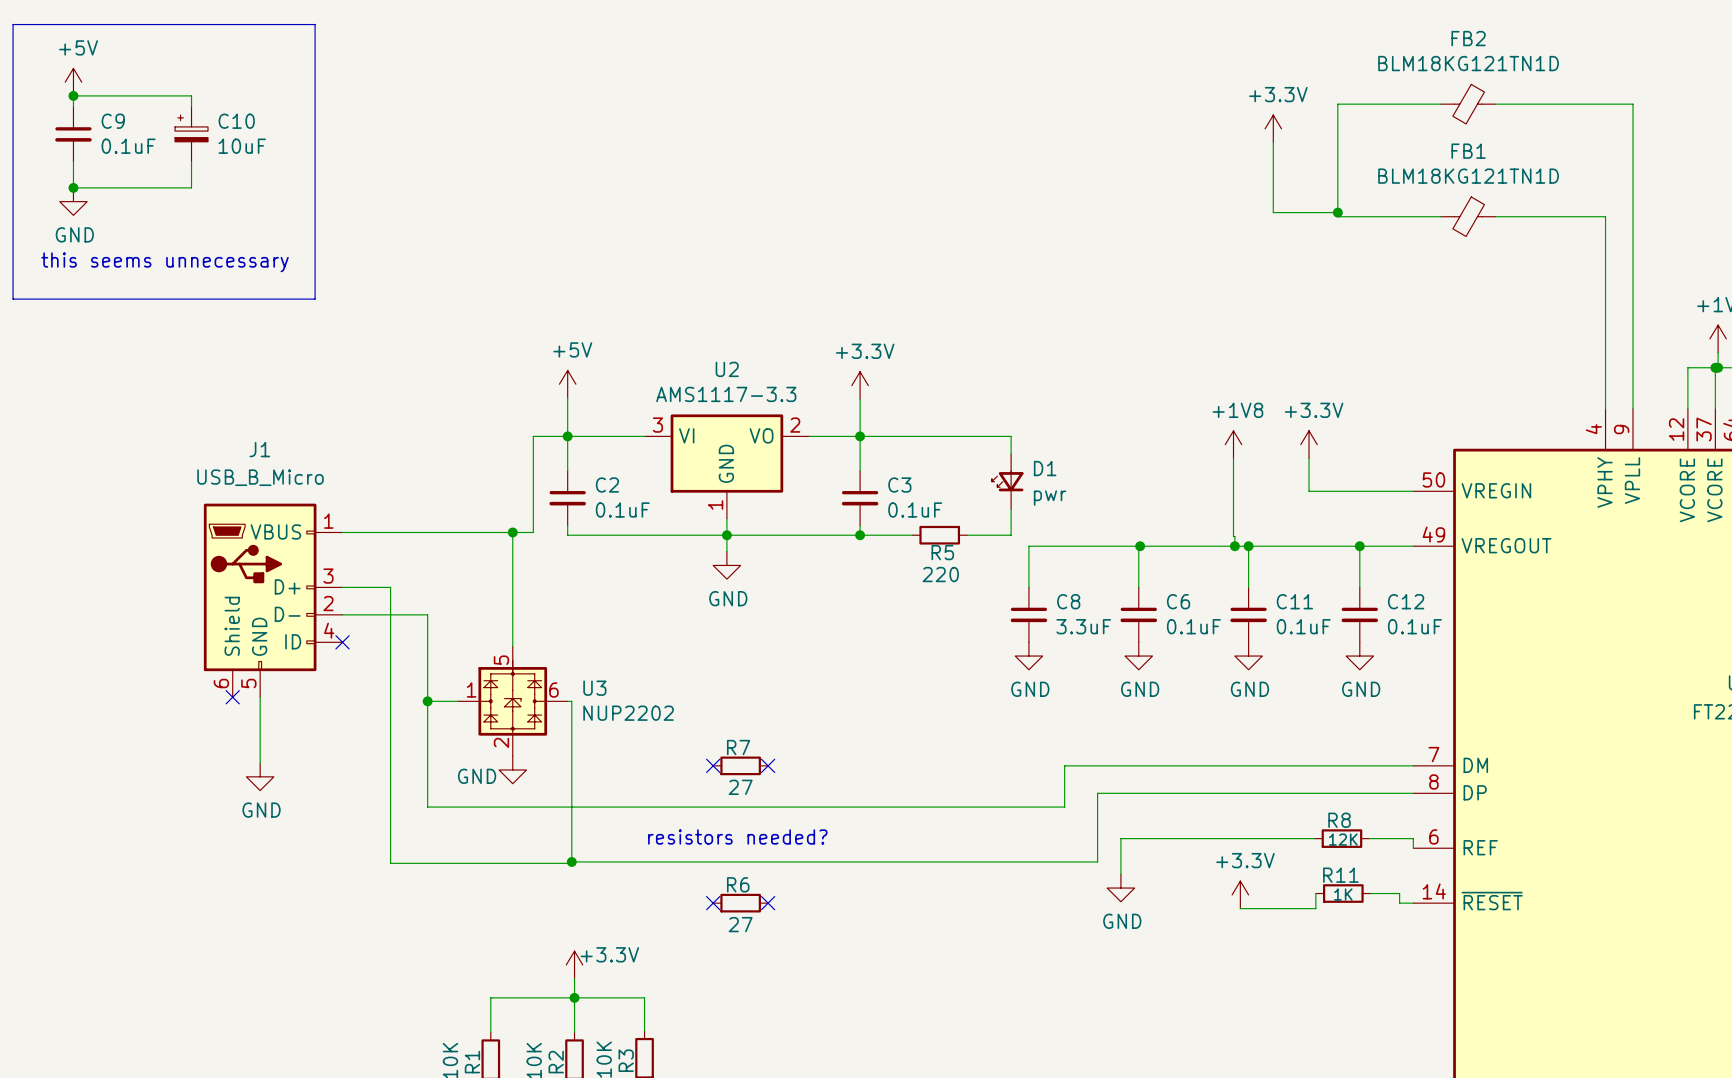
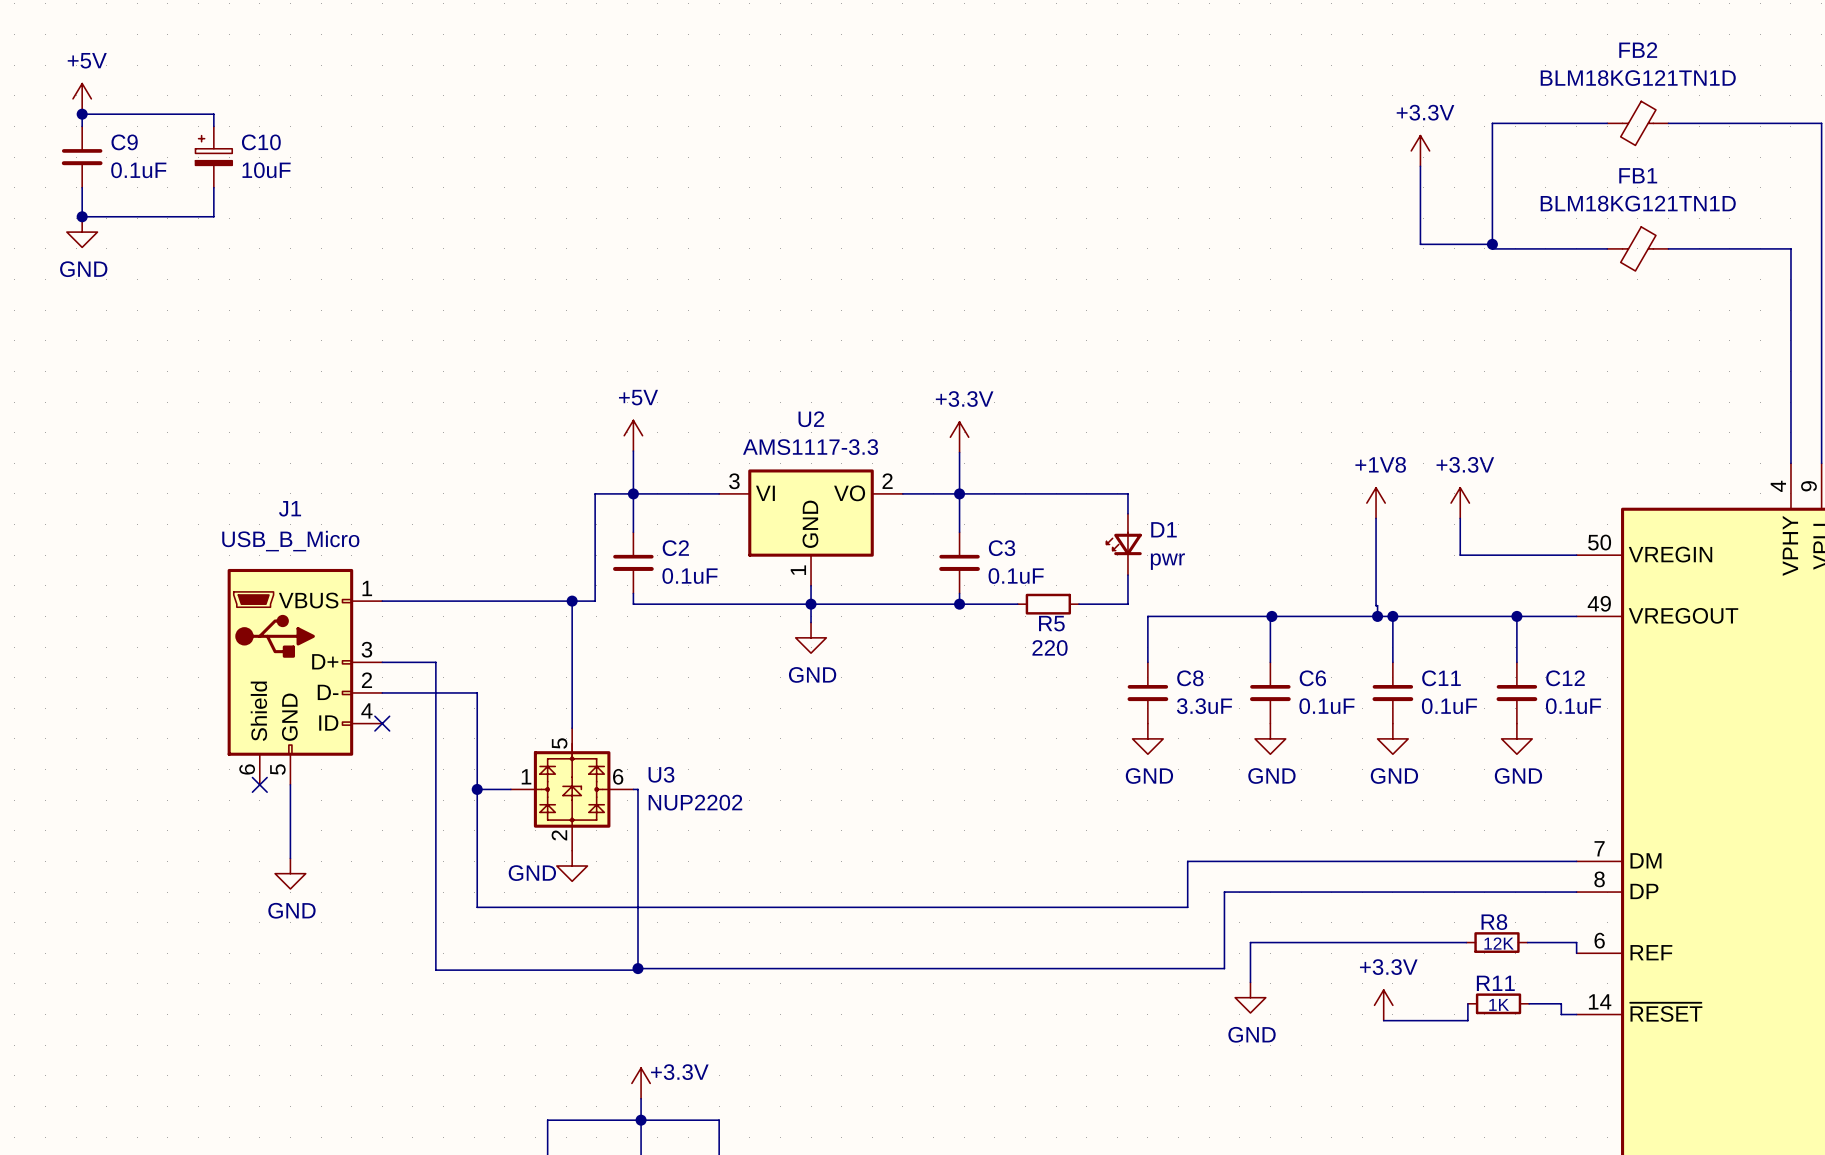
line: (13, 24) (315, 24) (315, 299) (13, 299) (13, 24) -> none
text: this seems unnecessary (165, 262) -> none
no-connect mark: (713, 765) -> none
R7: 27 (740, 765) -> none
no-connect mark: (768, 765) -> none
text: resistors needed? (737, 836) -> none
no-connect mark: (713, 903) -> none
R6: 27 (740, 903) -> none
no-connect mark: (768, 903) -> none

